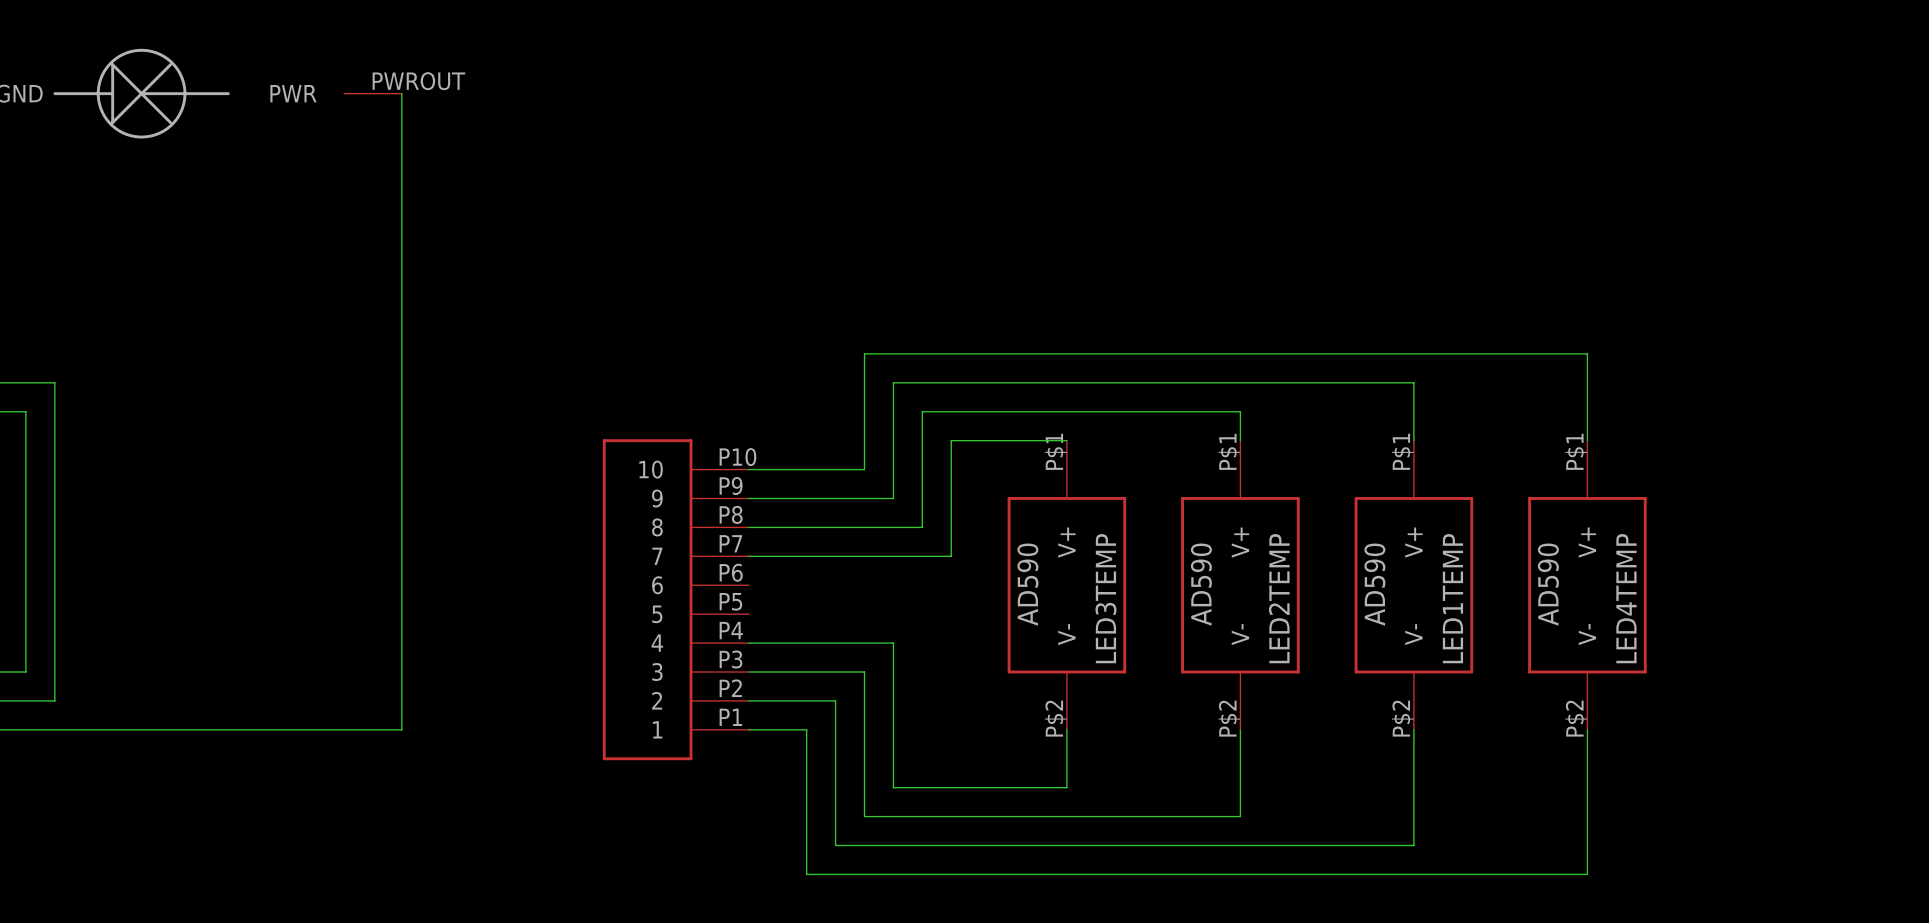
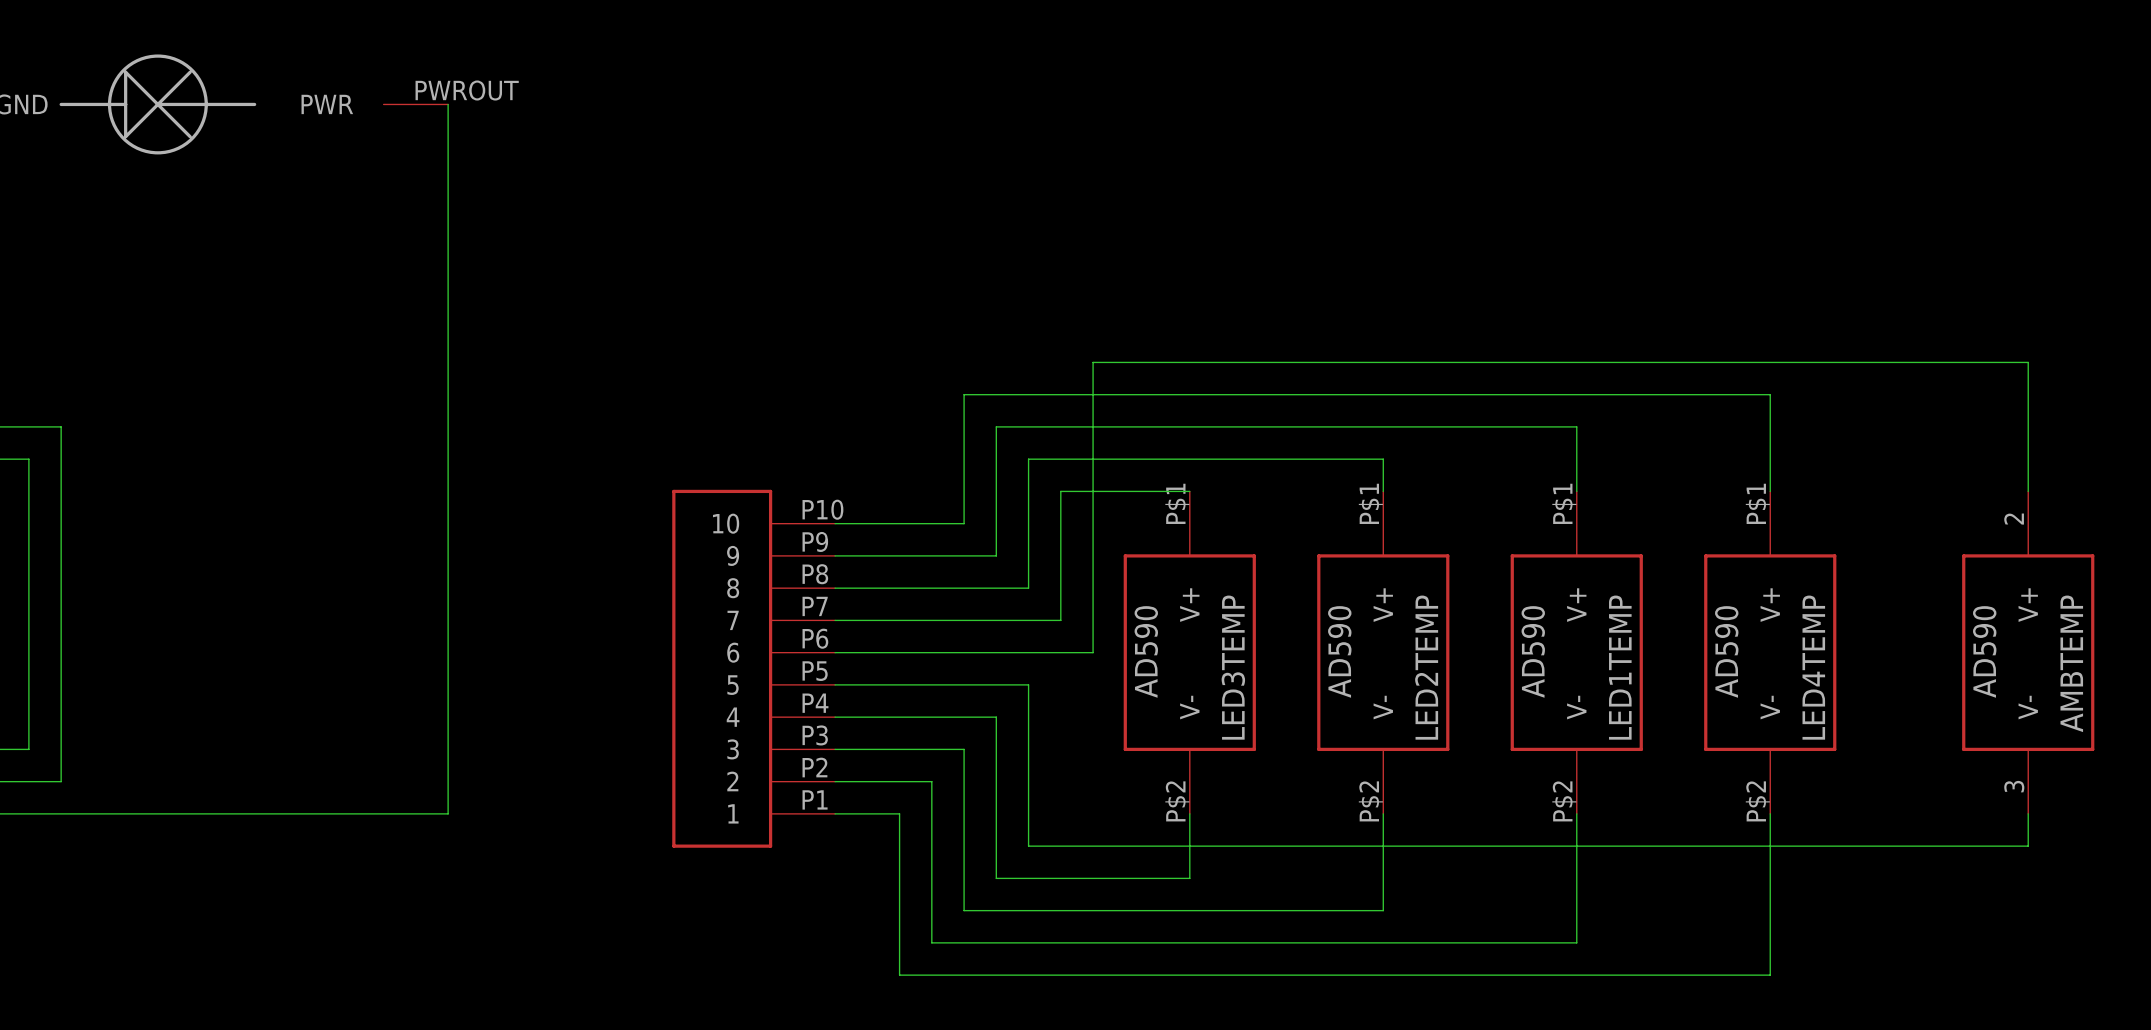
wire: none -> (2028, 491) (2028, 362) (1093, 362) (1093, 652) (835, 652)
AMBTEMP: none -> (2028, 652)
wire: none -> (835, 684) (1028, 684) (1028, 846) (2028, 846) (2028, 813)

